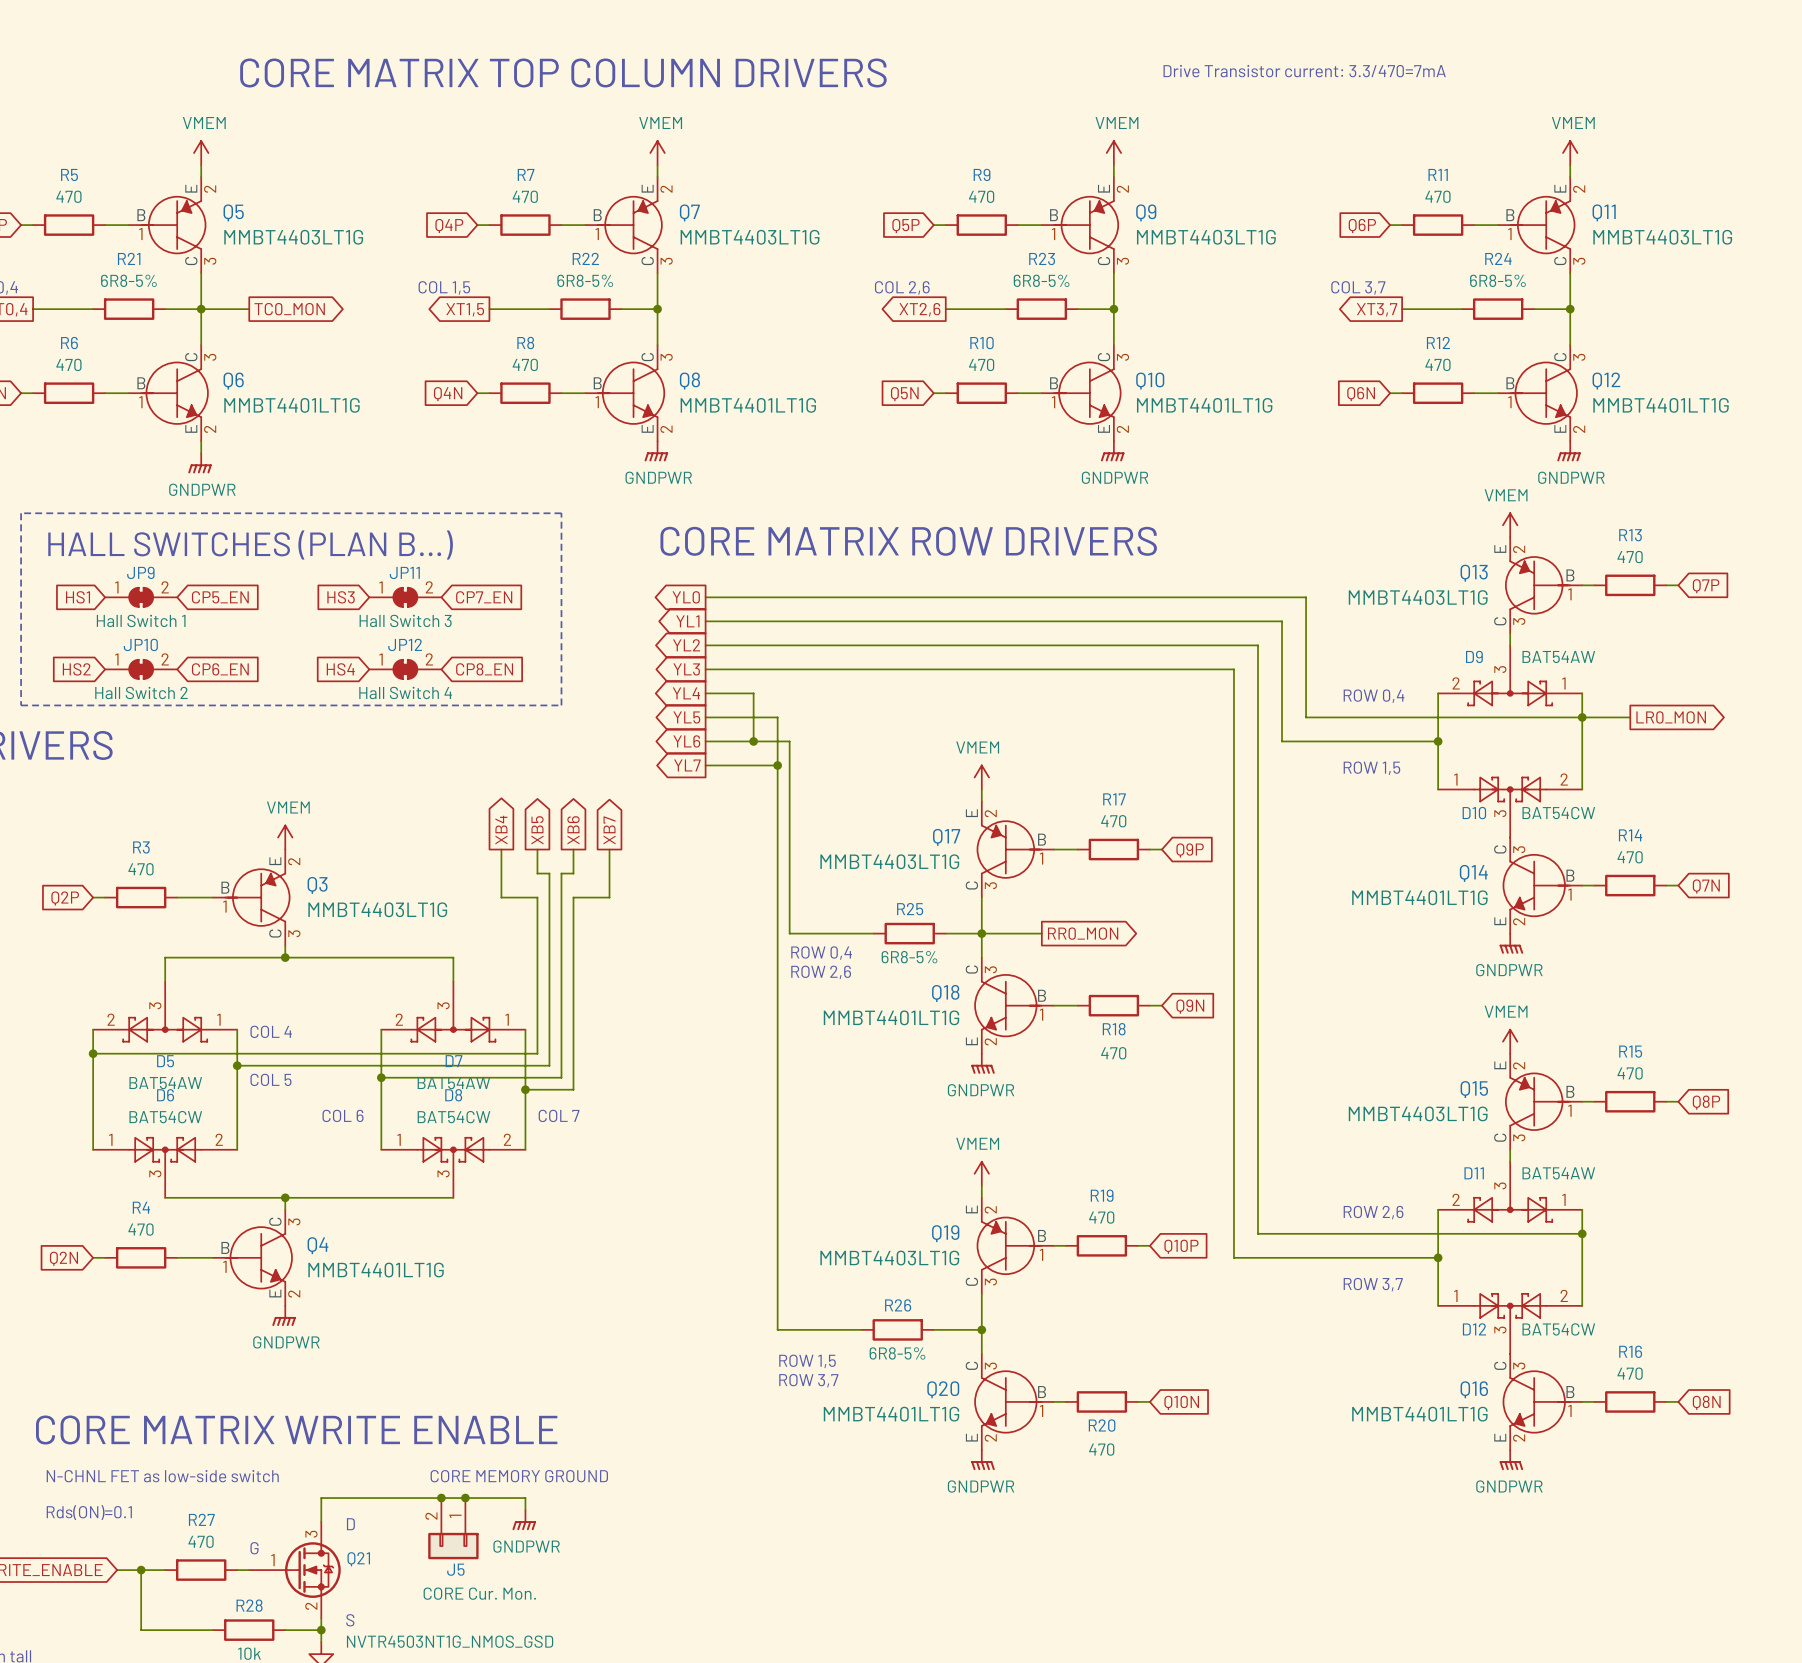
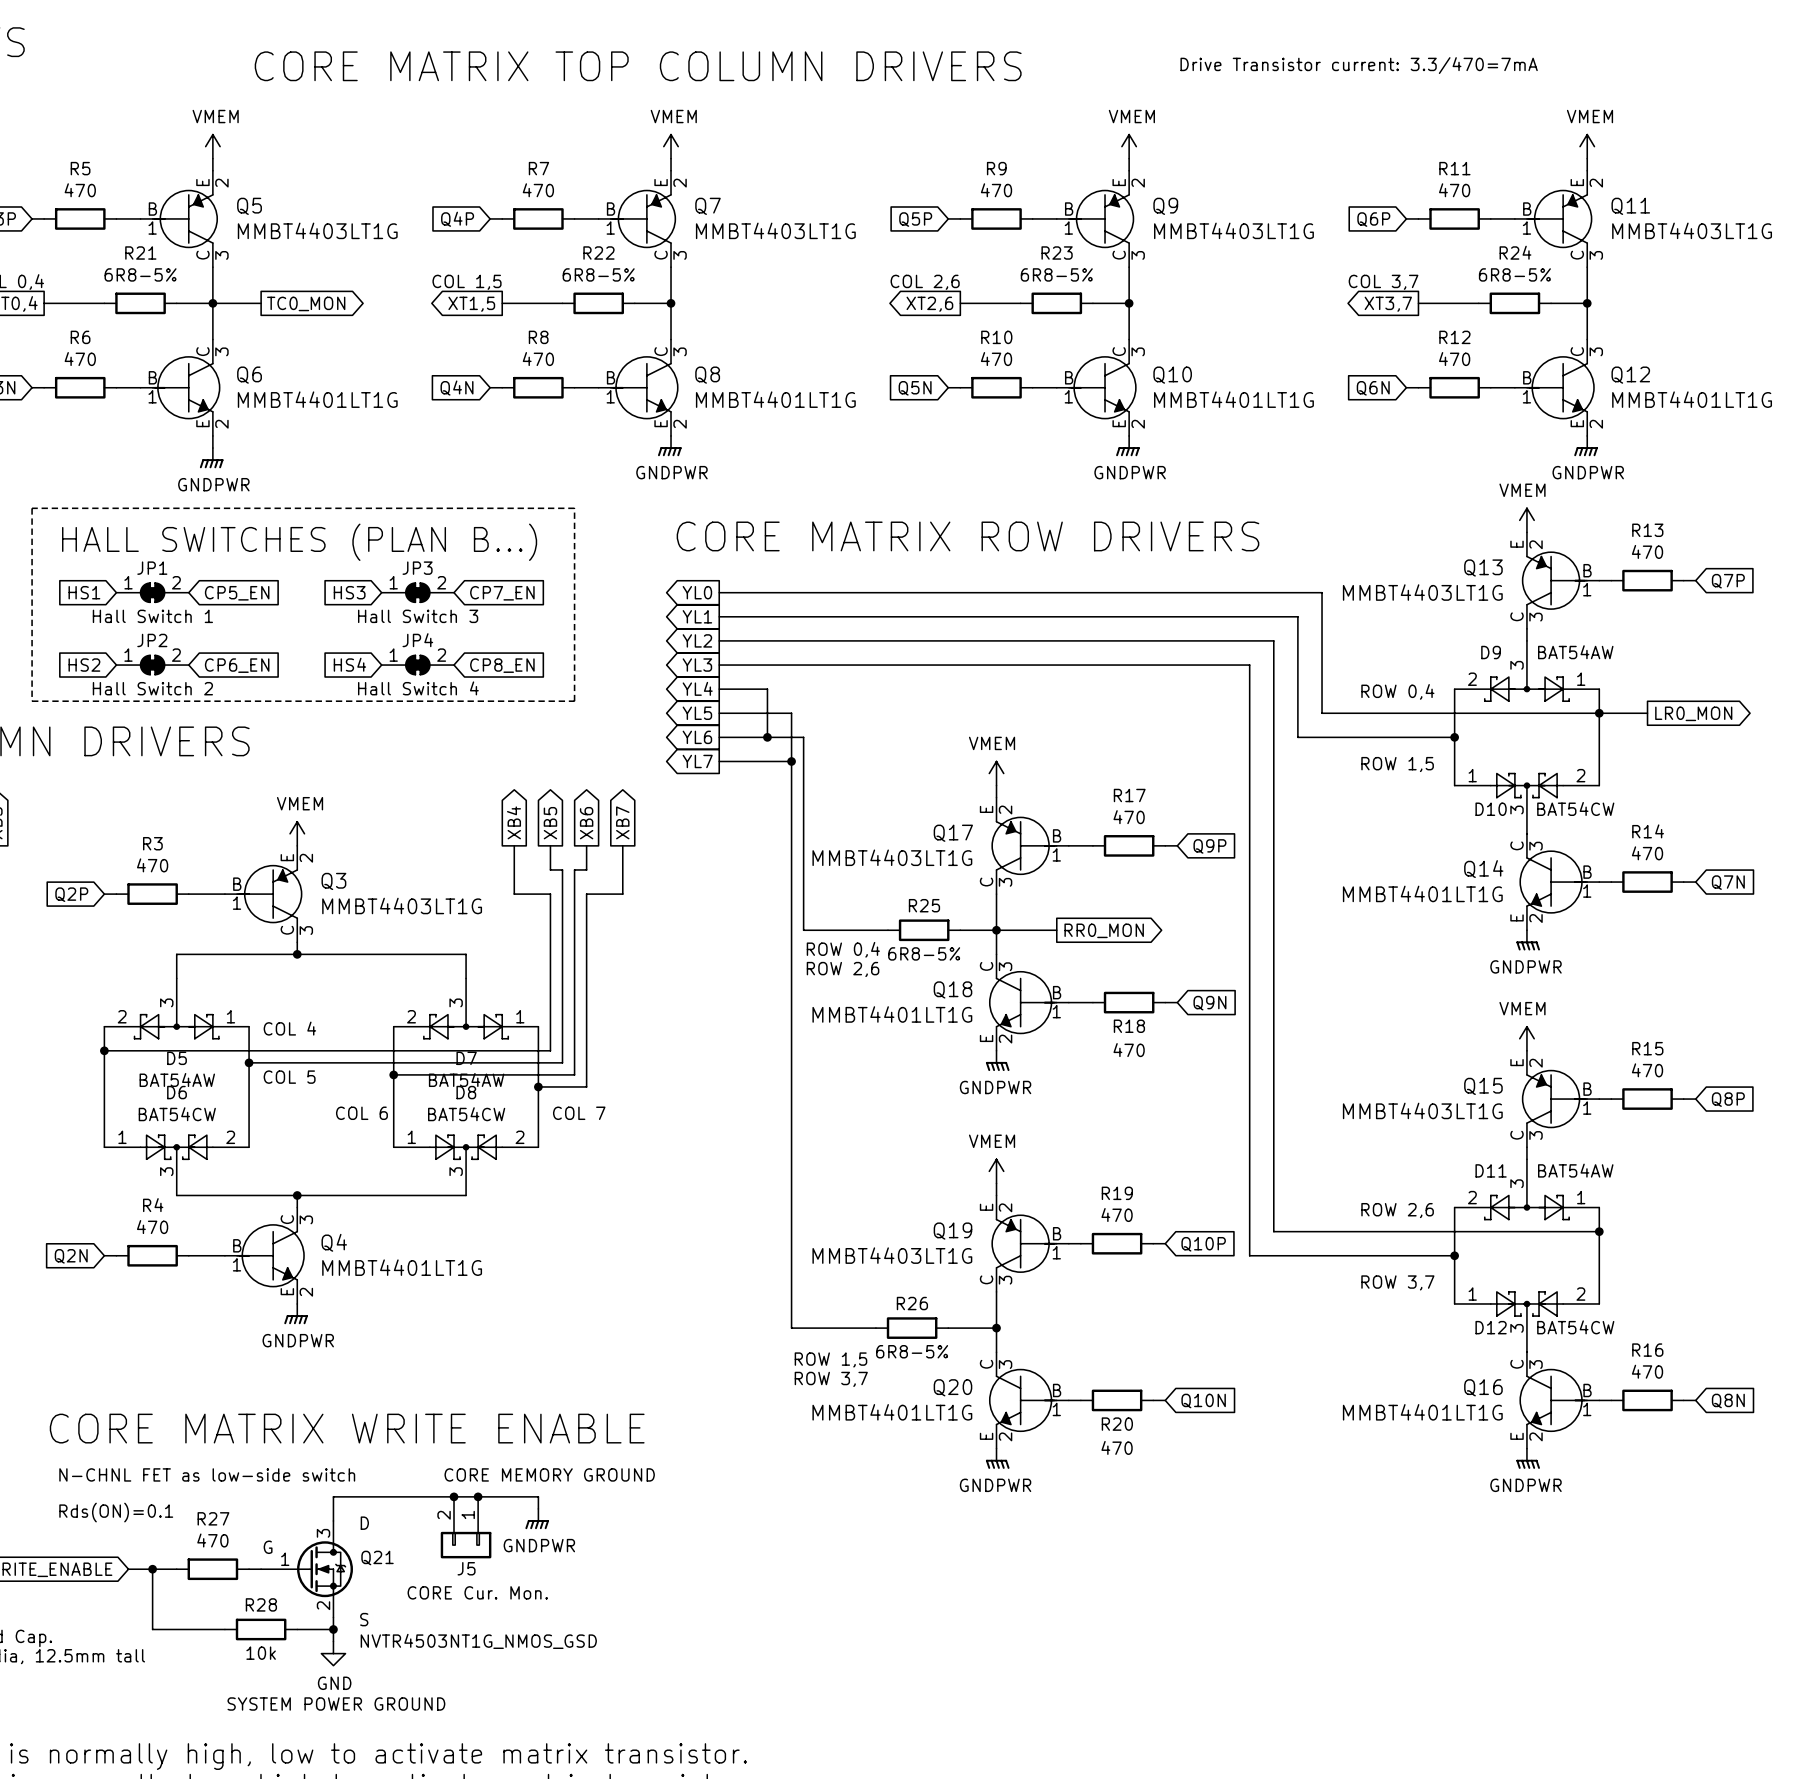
JP9 name: JP9 (140, 572) -> JP1 (152, 568)
JP11 name: JP11 (404, 572) -> JP3 (417, 568)
JP10 name: JP10 (140, 644) -> JP2 (152, 640)
JP12 name: JP12 (405, 644) -> JP4 (417, 640)

